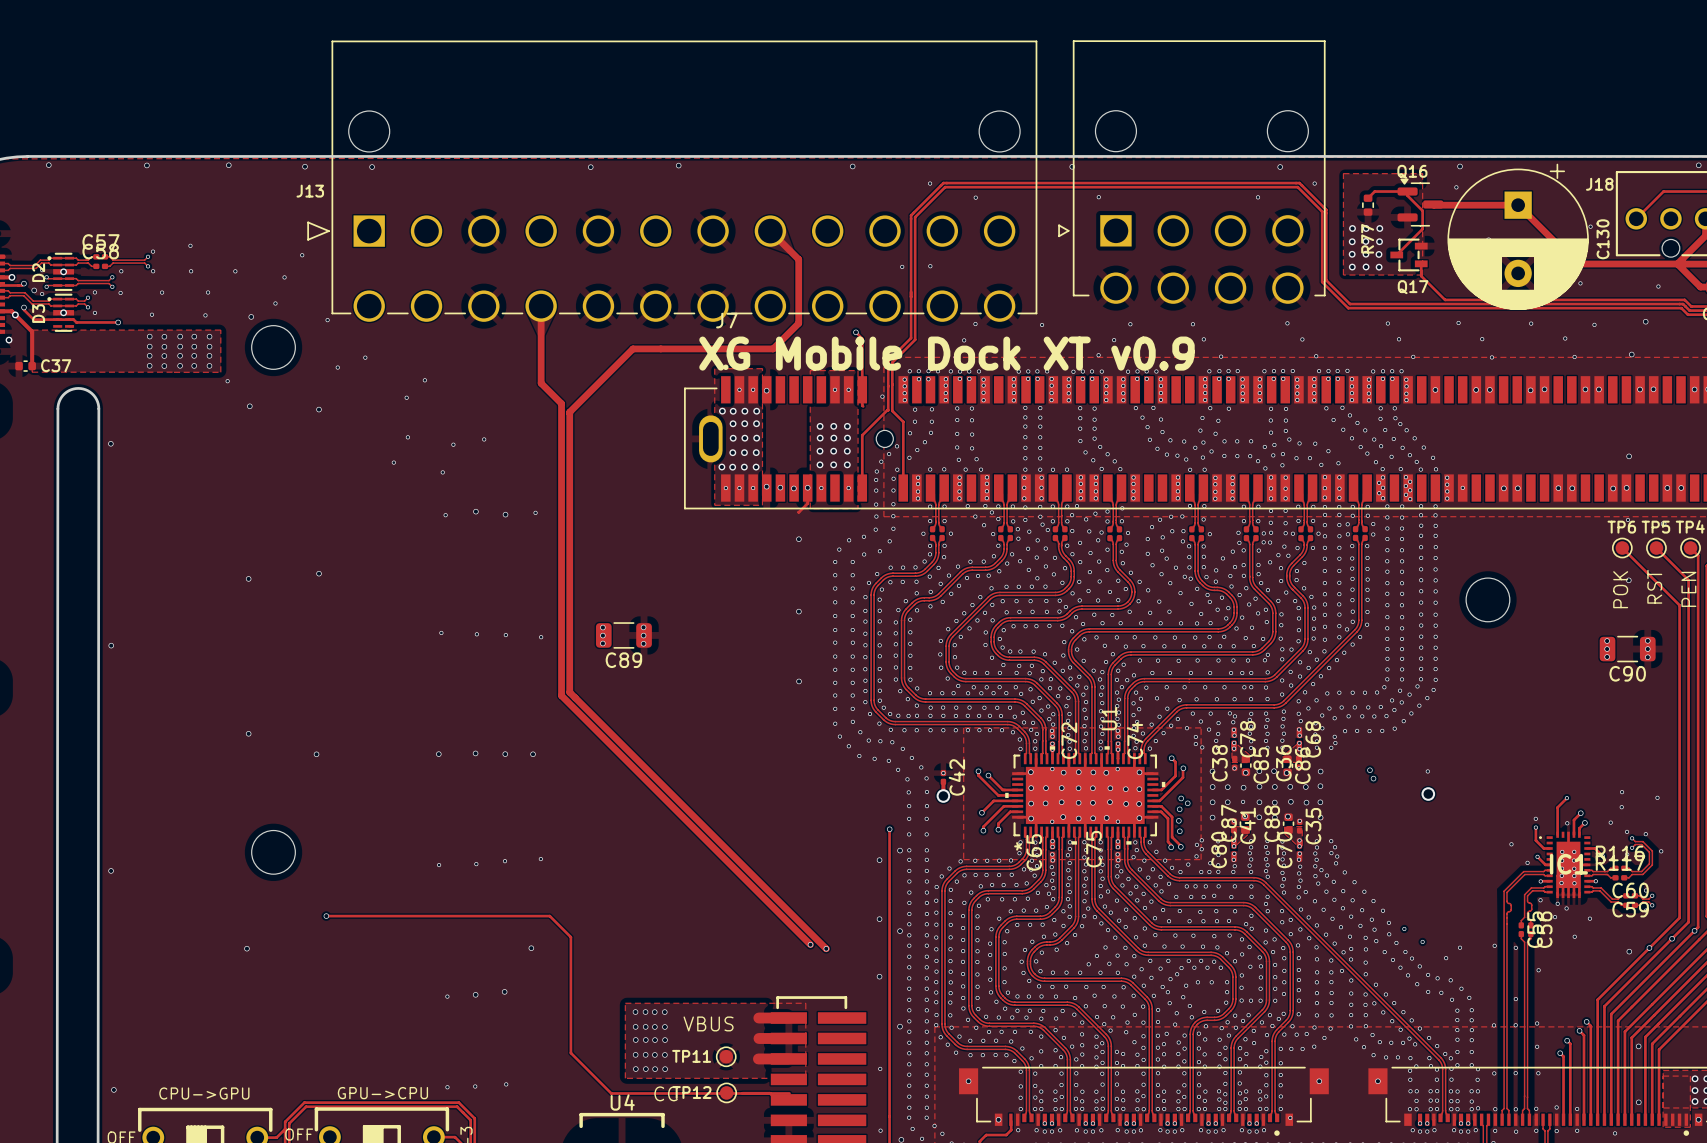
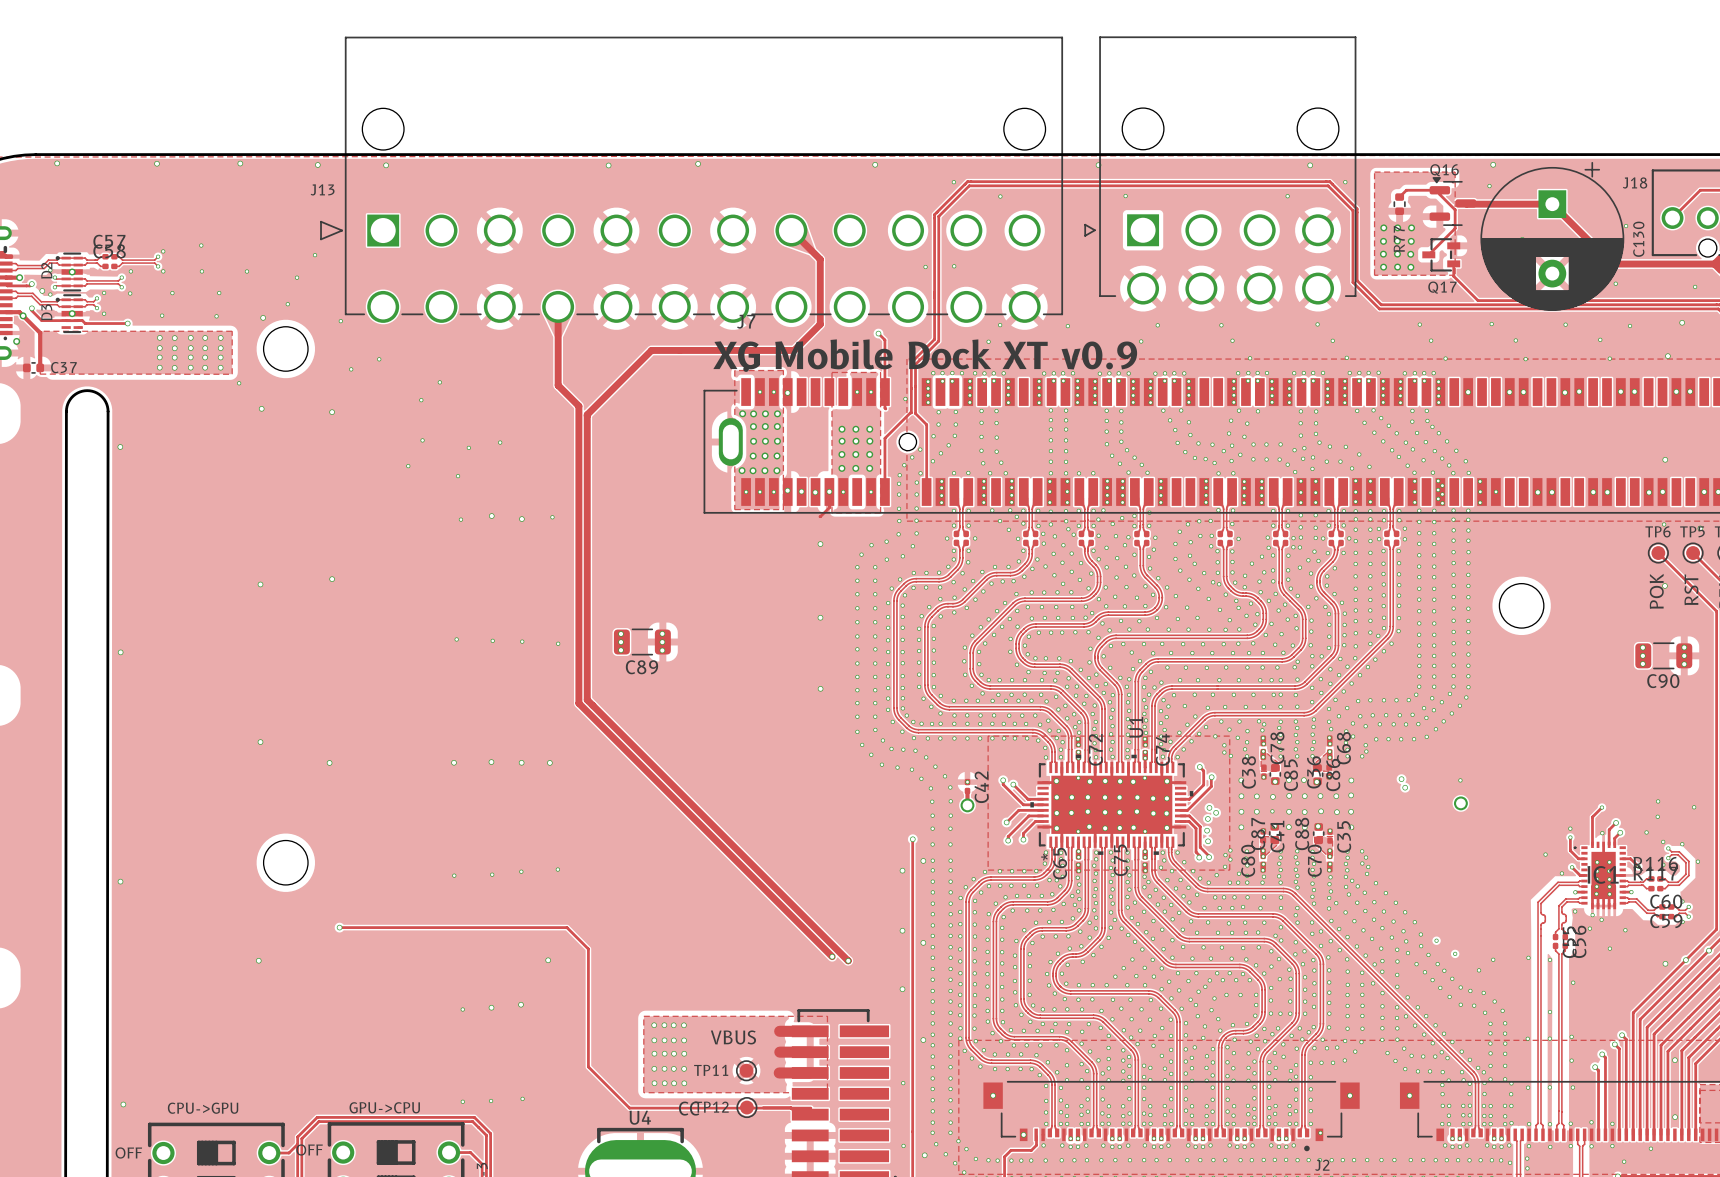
via: (1379, 482) -> none
via: (1447, 484) -> none
via: none -> (1480, 491)
via: (1447, 491) -> none
via: (1379, 493) -> none

